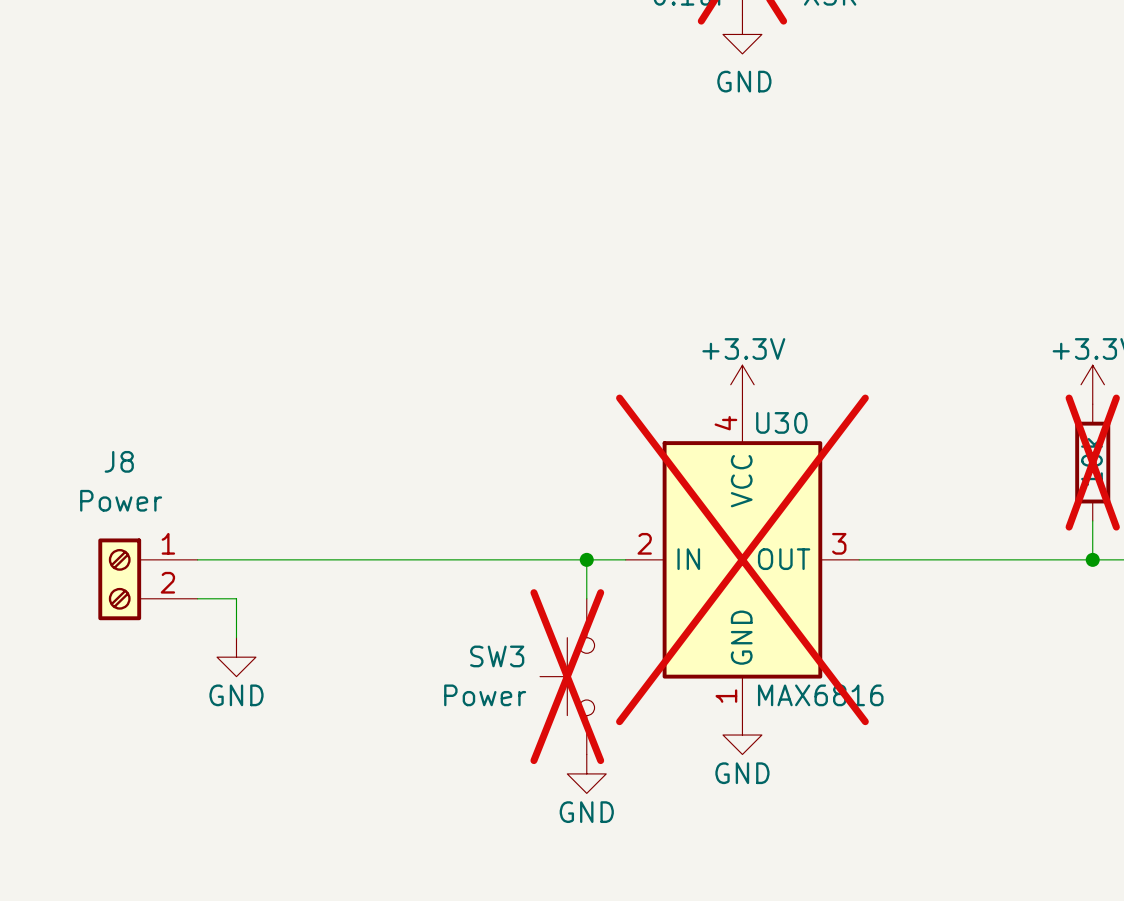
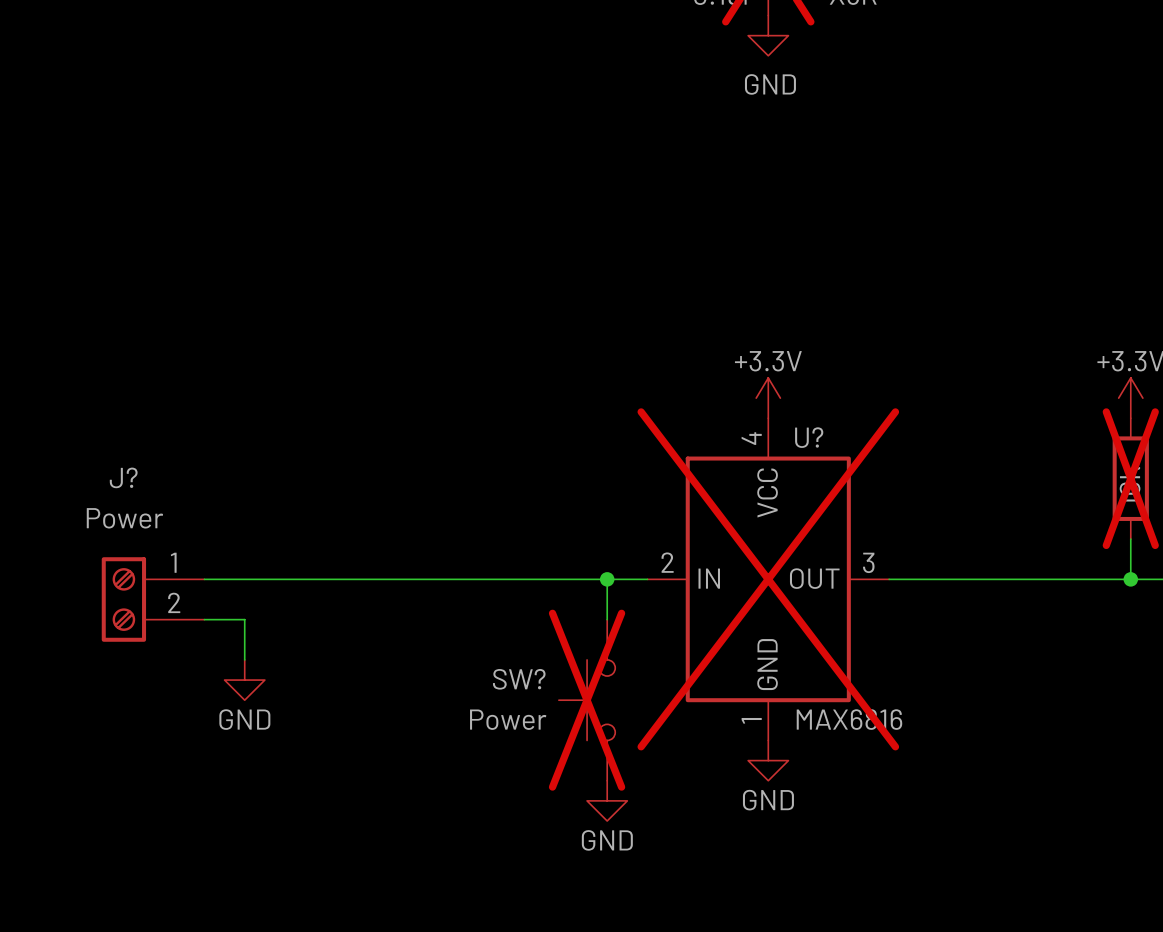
U30 name: U30 (781, 422) -> U? (809, 437)
J8 name: J8 (119, 461) -> J? (123, 477)
SW3 name: SW3 (497, 656) -> SW? (519, 679)

